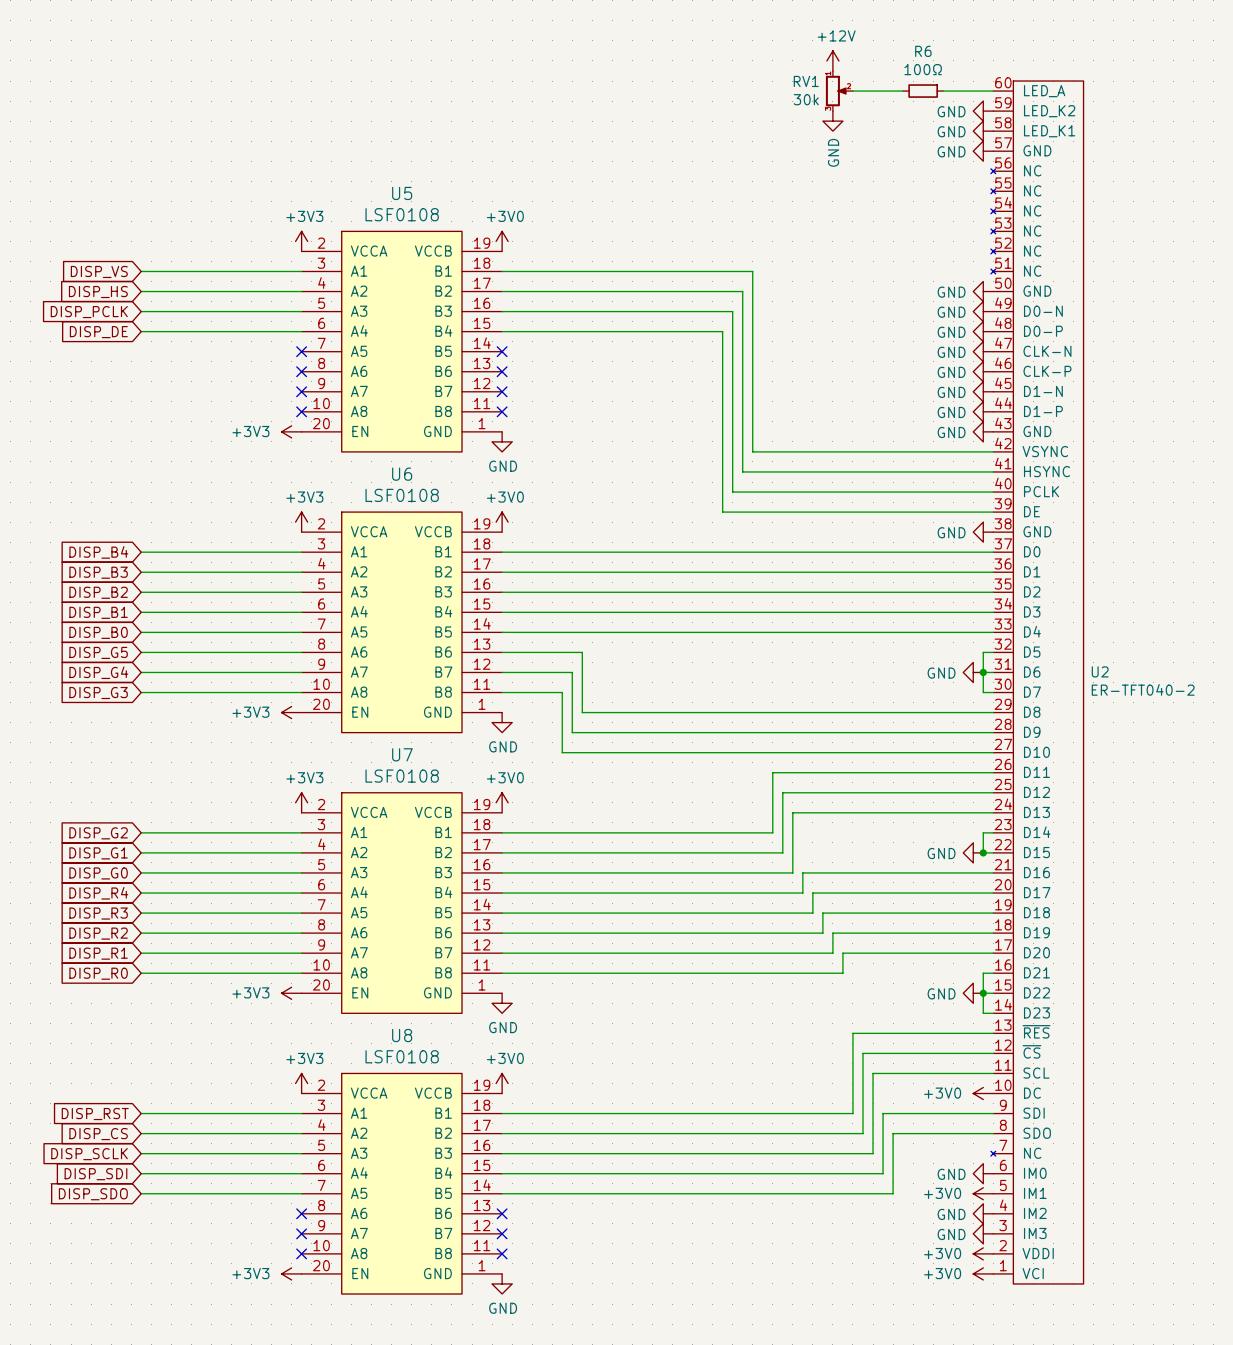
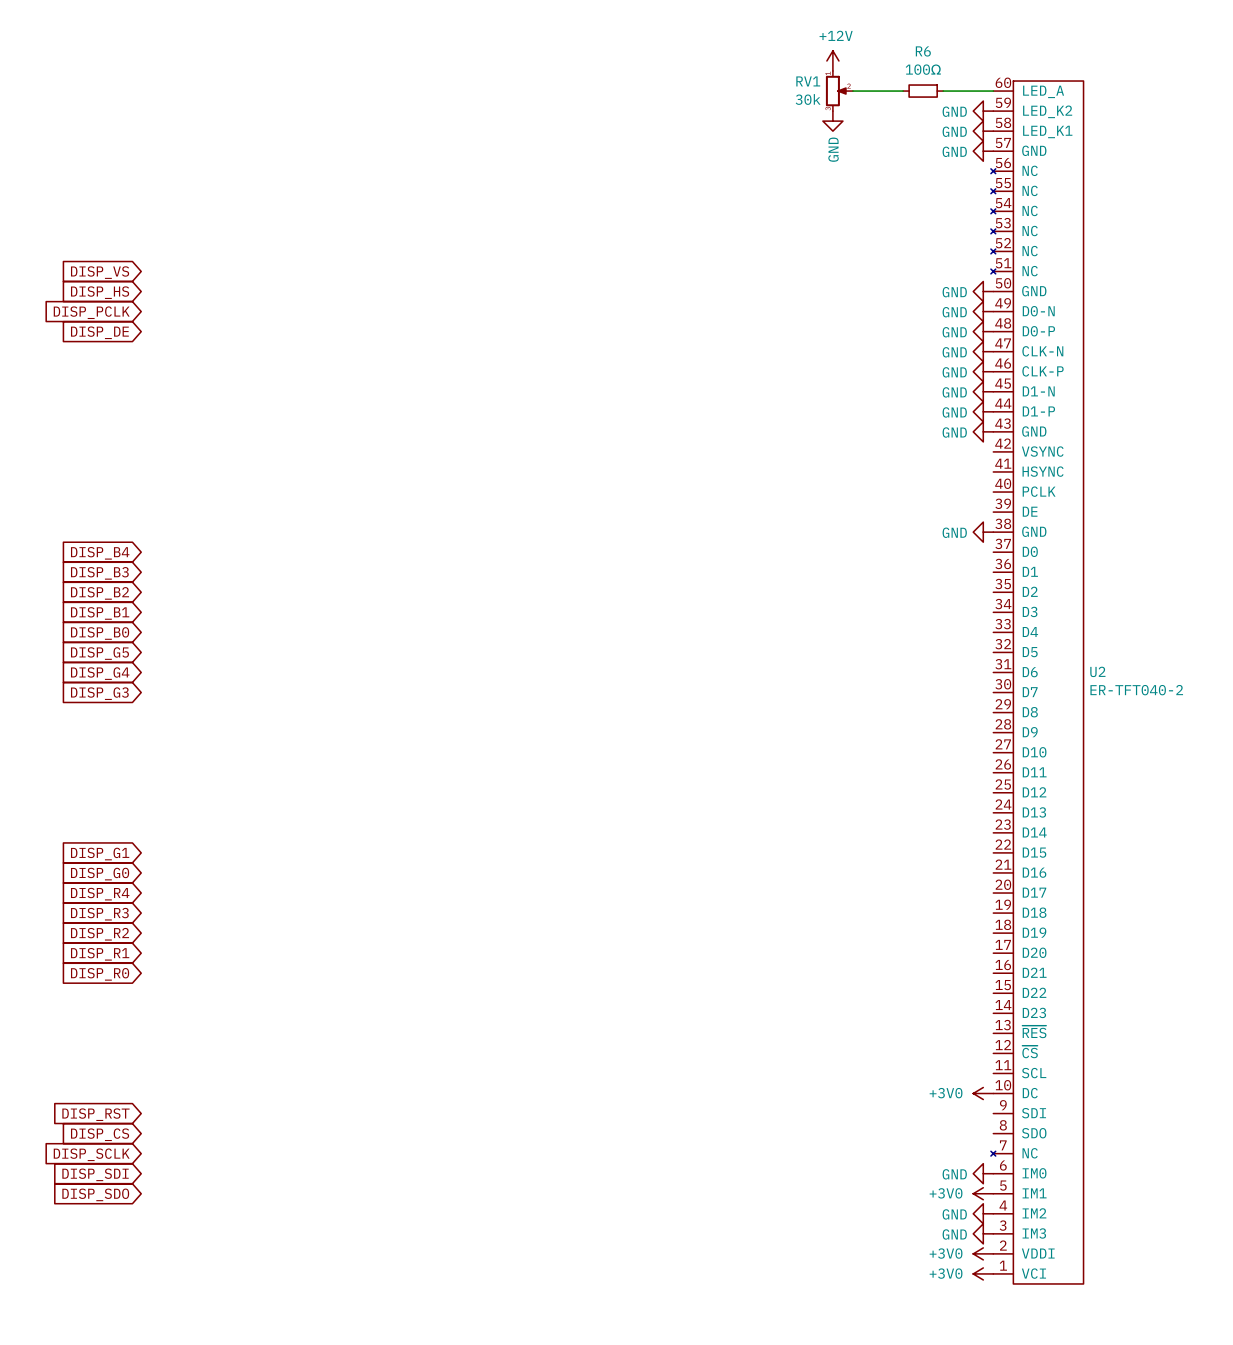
power symbol: +3V3 (301, 241) -> none
power symbol: +3V0 (502, 241) -> none
wire: (141, 271) (301, 271) -> none
wire: (502, 271) (752, 271) (752, 451) (993, 451) -> none
wire: (141, 291) (301, 291) -> none
wire: (502, 291) (742, 291) (742, 471) (993, 471) -> none
wire: (141, 311) (301, 311) -> none
wire: (502, 311) (732, 311) (732, 492) (993, 492) -> none
wire: (141, 331) (301, 331) -> none
wire: (502, 331) (722, 331) (722, 512) (993, 512) -> none
U5: LSF0108 (401, 341) -> none
no-connect mark: (301, 351) -> none
no-connect mark: (502, 351) -> none
no-connect mark: (301, 371) -> none
no-connect mark: (502, 371) -> none
no-connect mark: (301, 391) -> none
no-connect mark: (502, 391) -> none
no-connect mark: (301, 411) -> none
no-connect mark: (502, 411) -> none
power symbol: +3V3 (291, 431) -> none
power symbol: GND (502, 441) -> none
power symbol: +3V3 (301, 522) -> none
power symbol: +3V0 (502, 522) -> none
wire: (141, 552) (301, 552) -> none
wire: (502, 552) (993, 552) -> none
wire: (141, 572) (301, 572) -> none
wire: (502, 572) (993, 572) -> none
wire: (141, 592) (301, 592) -> none
wire: (502, 592) (993, 592) -> none
wire: (141, 612) (301, 612) -> none
wire: (502, 612) (993, 612) -> none
U6: LSF0108 (401, 622) -> none
wire: (141, 632) (301, 632) -> none
wire: (502, 632) (993, 632) -> none
wire: (141, 652) (301, 652) -> none
wire: (502, 652) (582, 652) (582, 712) (993, 712) -> none
wire: (993, 652) (983, 652) (983, 692) (993, 692) -> none
wire: (141, 672) (301, 672) -> none
wire: (502, 672) (572, 672) (572, 732) (993, 732) -> none
power symbol: GND (973, 672) -> none
wire: (983, 672) (993, 672) -> none
junction: (983, 672) -> none
wire: (141, 692) (301, 692) -> none
wire: (502, 692) (562, 692) (562, 752) (993, 752) -> none
power symbol: +3V3 (291, 712) -> none
power symbol: GND (502, 722) -> none
wire: (993, 772) (772, 772) (772, 832) (502, 832) -> none
wire: (993, 792) (782, 792) (782, 852) (502, 852) -> none
power symbol: +3V3 (301, 802) -> none
power symbol: +3V0 (502, 802) -> none
wire: (993, 812) (792, 812) (792, 872) (502, 872) -> none
wire: (141, 832) (301, 832) -> none
wire: (993, 832) (983, 832) (983, 852) (993, 852) -> none
global label: DISP_G2 (98, 833) -> none
wire: (141, 852) (301, 852) -> none
power symbol: GND (973, 852) -> none
junction: (983, 852) -> none
wire: (141, 872) (301, 872) -> none
wire: (993, 872) (802, 872) (802, 893) (502, 893) -> none
wire: (141, 893) (301, 893) -> none
wire: (993, 893) (812, 893) (812, 913) (502, 913) -> none
U7: LSF0108 (401, 903) -> none
wire: (141, 913) (301, 913) -> none
wire: (993, 913) (822, 913) (822, 933) (502, 933) -> none
wire: (141, 933) (301, 933) -> none
wire: (993, 933) (832, 933) (832, 953) (502, 953) -> none
wire: (141, 953) (301, 953) -> none
wire: (993, 953) (842, 953) (842, 973) (502, 973) -> none
wire: (141, 973) (301, 973) -> none
wire: (993, 973) (983, 973) (983, 1013) (993, 1013) -> none
power symbol: +3V3 (291, 993) -> none
power symbol: GND (973, 993) -> none
wire: (983, 993) (993, 993) -> none
junction: (983, 993) -> none
power symbol: GND (502, 1003) -> none
wire: (993, 1033) (852, 1033) (852, 1113) (502, 1113) -> none
wire: (993, 1053) (862, 1053) (862, 1133) (502, 1133) -> none
wire: (993, 1073) (873, 1073) (873, 1153) (502, 1153) -> none
power symbol: +3V3 (301, 1083) -> none
power symbol: +3V0 (502, 1083) -> none
wire: (141, 1113) (301, 1113) -> none
wire: (993, 1113) (883, 1113) (883, 1173) (502, 1173) -> none
wire: (141, 1133) (301, 1133) -> none
wire: (993, 1133) (893, 1133) (893, 1193) (502, 1193) -> none
wire: (141, 1153) (301, 1153) -> none
wire: (141, 1173) (301, 1173) -> none
U8: LSF0108 (401, 1183) -> none
wire: (141, 1193) (301, 1193) -> none
no-connect mark: (301, 1213) -> none
no-connect mark: (502, 1213) -> none
no-connect mark: (301, 1233) -> none
no-connect mark: (502, 1233) -> none
no-connect mark: (301, 1253) -> none
no-connect mark: (502, 1253) -> none
power symbol: +3V3 (291, 1273) -> none
power symbol: GND (502, 1283) -> none

